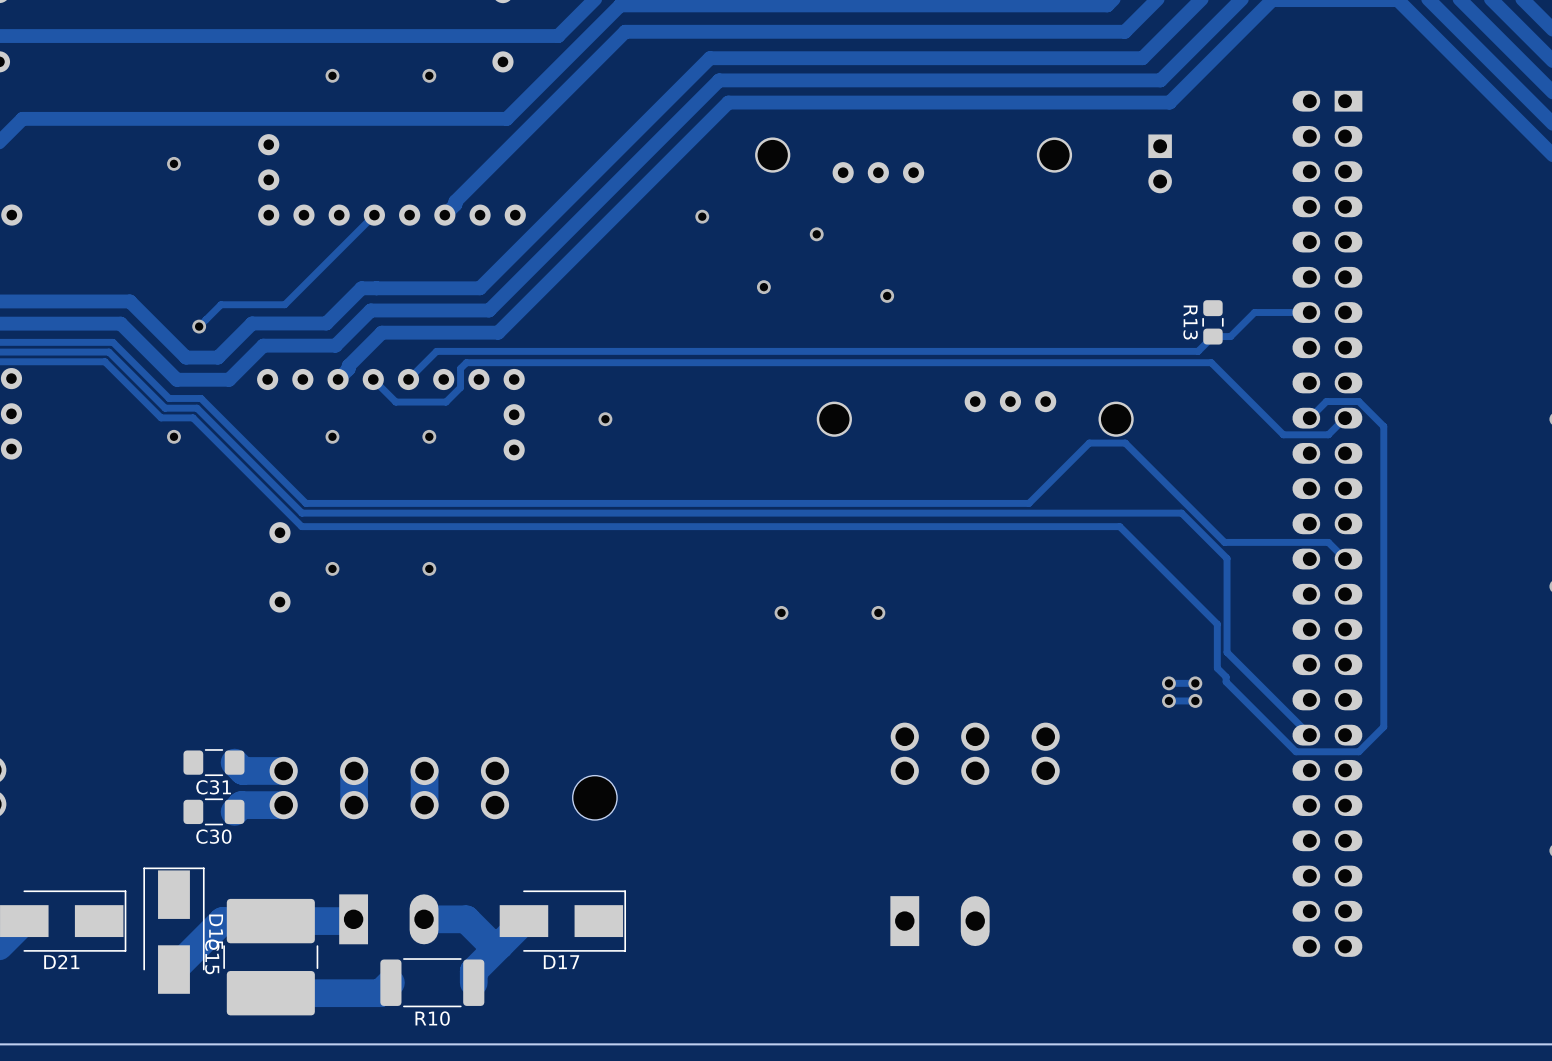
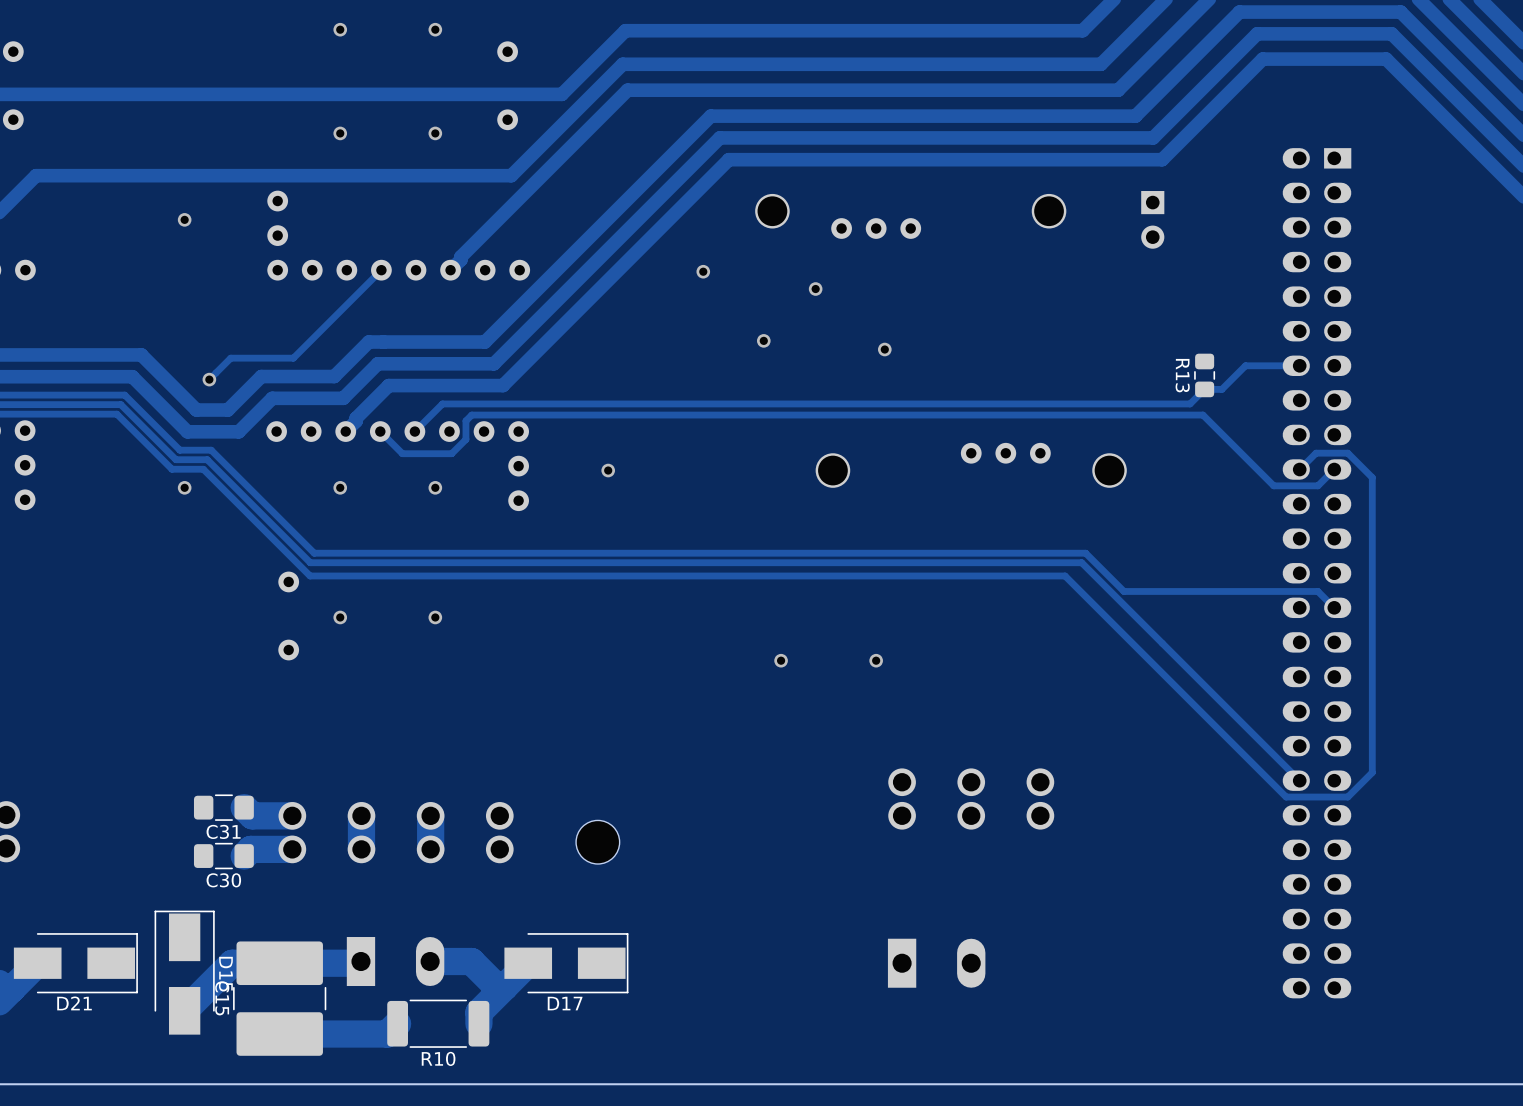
track: (1028, 503) (1089, 443) (1125, 443) (1224, 542) -> (1024, 553) (1085, 553) (1123, 591) (1216, 591)
track: (1087, 513) (1181, 513) (1227, 558) (1227, 652) -> (1081, 562) (1218, 699)
track: (1070, 526) (1119, 526) (1217, 624) (1217, 668) (1226, 677) (1226, 681) -> (1065, 575) (1217, 728)
via: (1168, 683) -> none
track: (1195, 683) (1168, 683) -> none
via: (1195, 683) -> none
via: (1168, 700) -> none
track: (1195, 700) (1168, 700) -> none
via: (1195, 700) -> none

